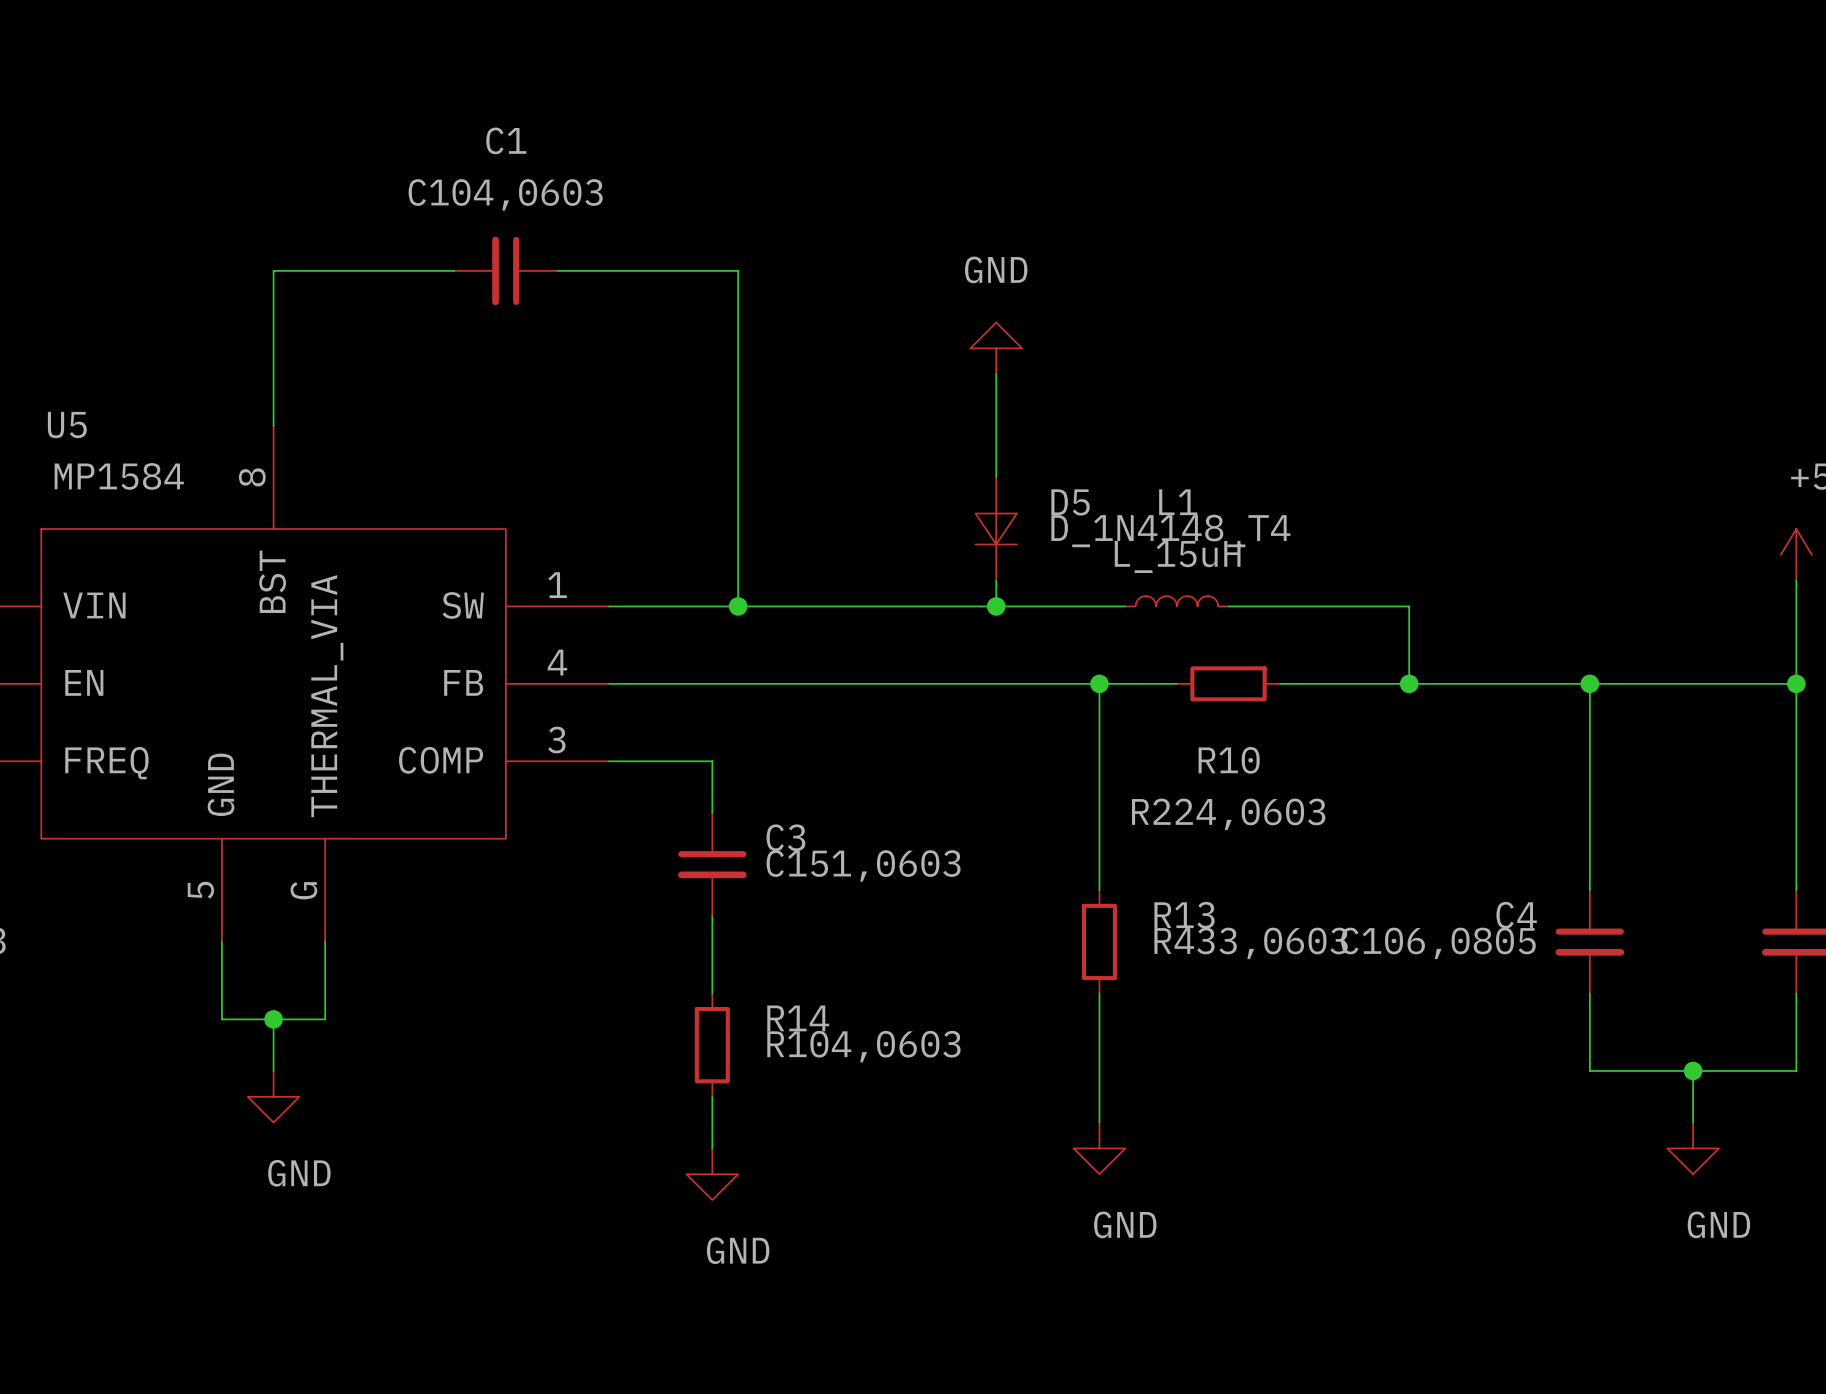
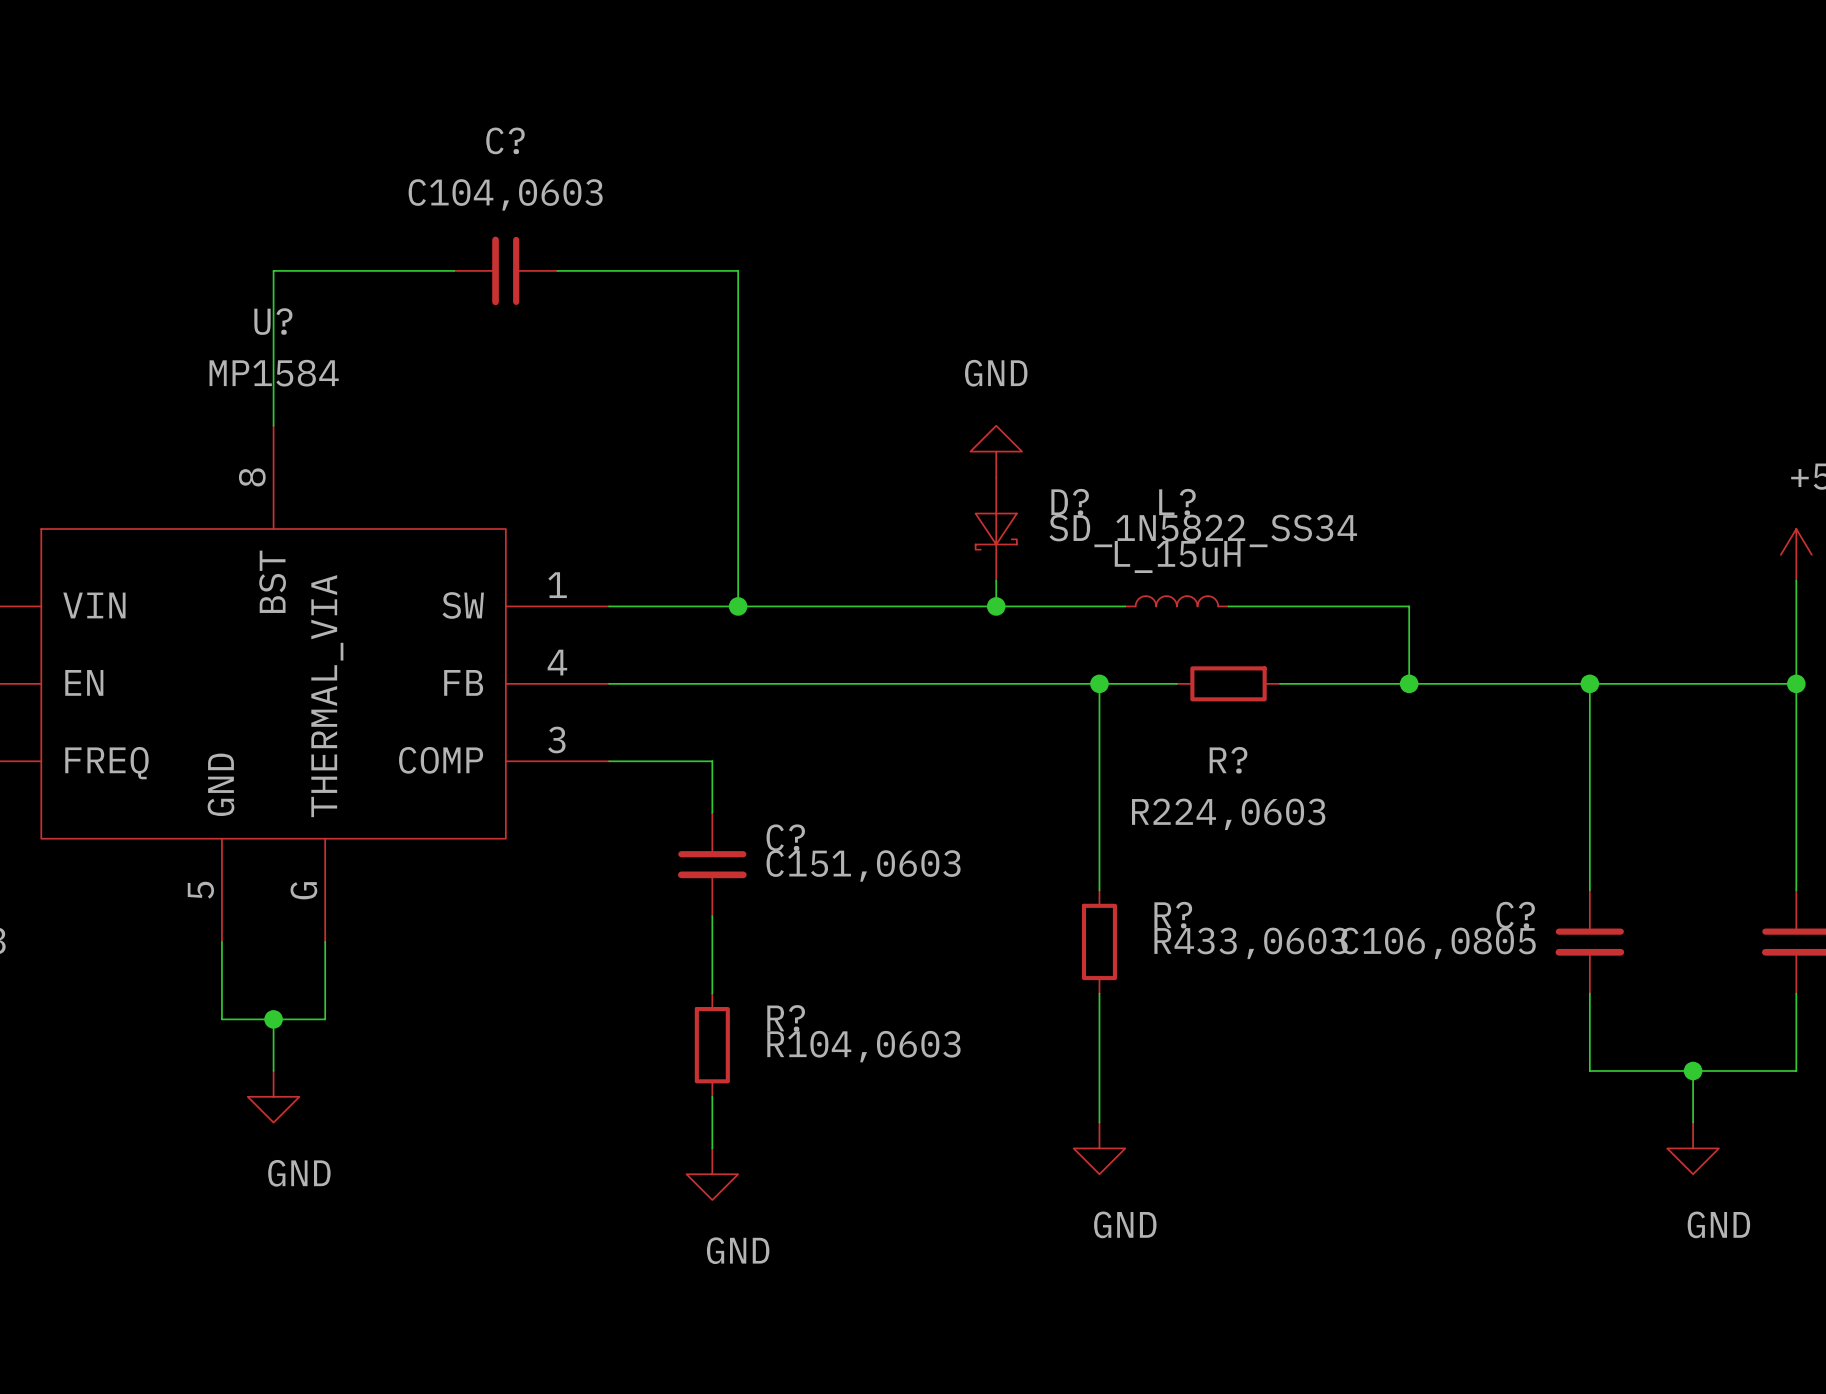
C1 name: C1 (506, 140) -> C? (505, 140)
power symbol position: GND (996, 348) -> GND (996, 451)
wire: (996, 374) (996, 477) -> none
U5 name: U5 (67, 425) -> U? (273, 321)
U5 value position: MP1584 (119, 476) -> MP1584 (274, 373)
L1 name: L1 (1178, 502) -> L? (1177, 502)
D5: D_1N4148_T4 (996, 529) -> none
D?: none -> SD_1N5822_SS34 (996, 529)
R10 name: R10 (1229, 760) -> R? (1228, 760)
C3 name: C3 (785, 837) -> C? (785, 837)
R13 name: R13 (1184, 915) -> R? (1173, 915)
C4 name: C4 (1516, 915) -> C? (1515, 915)
R14 name: R14 (798, 1018) -> R? (786, 1018)

